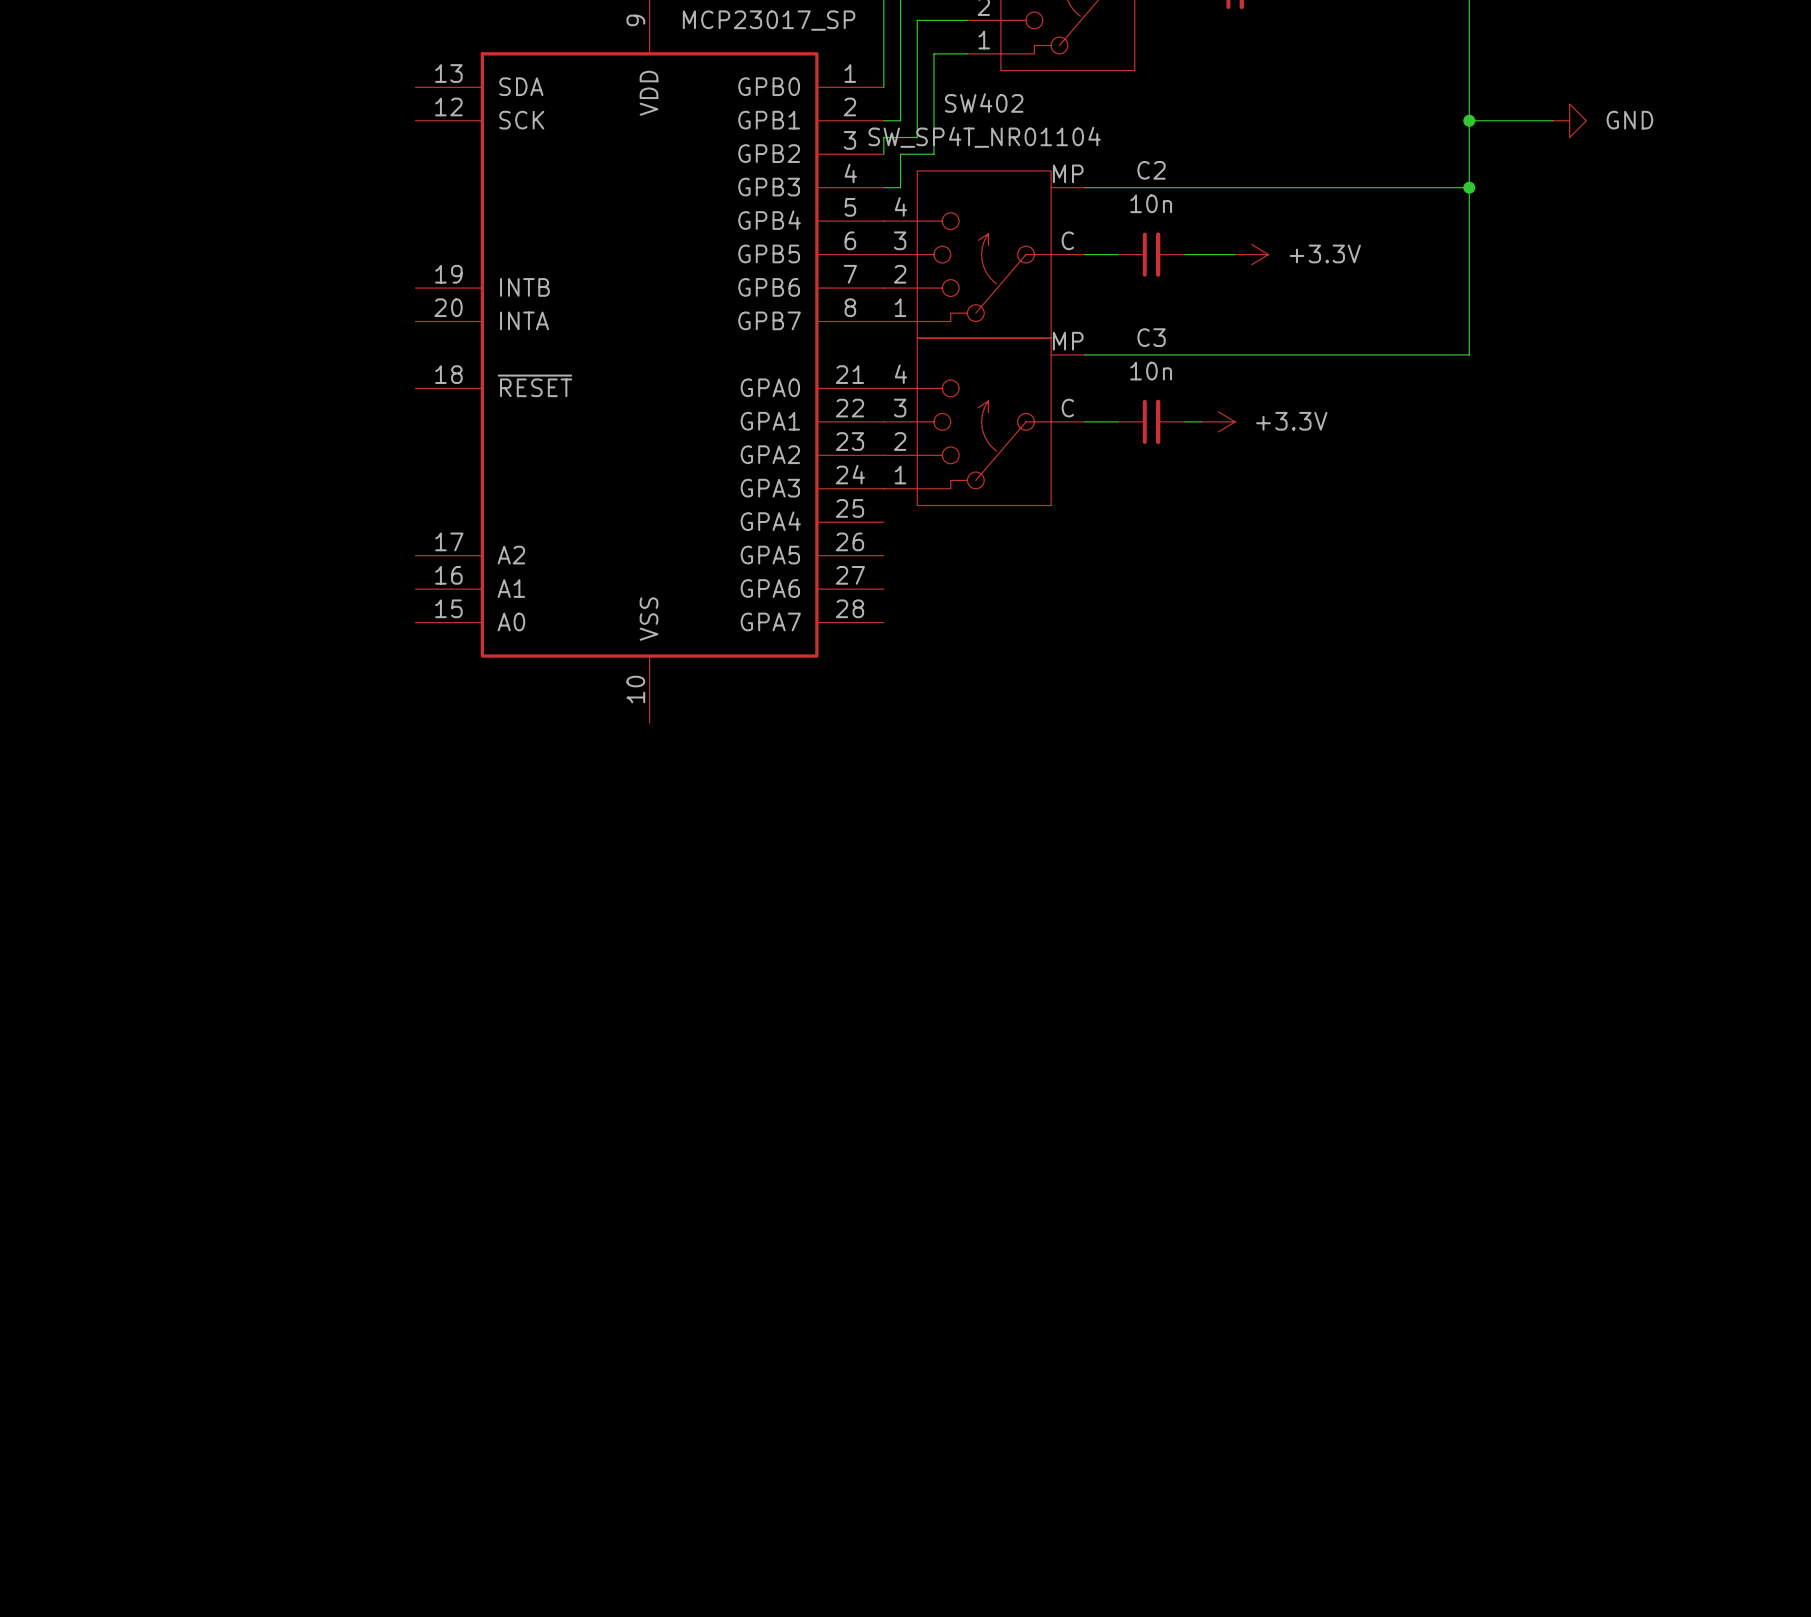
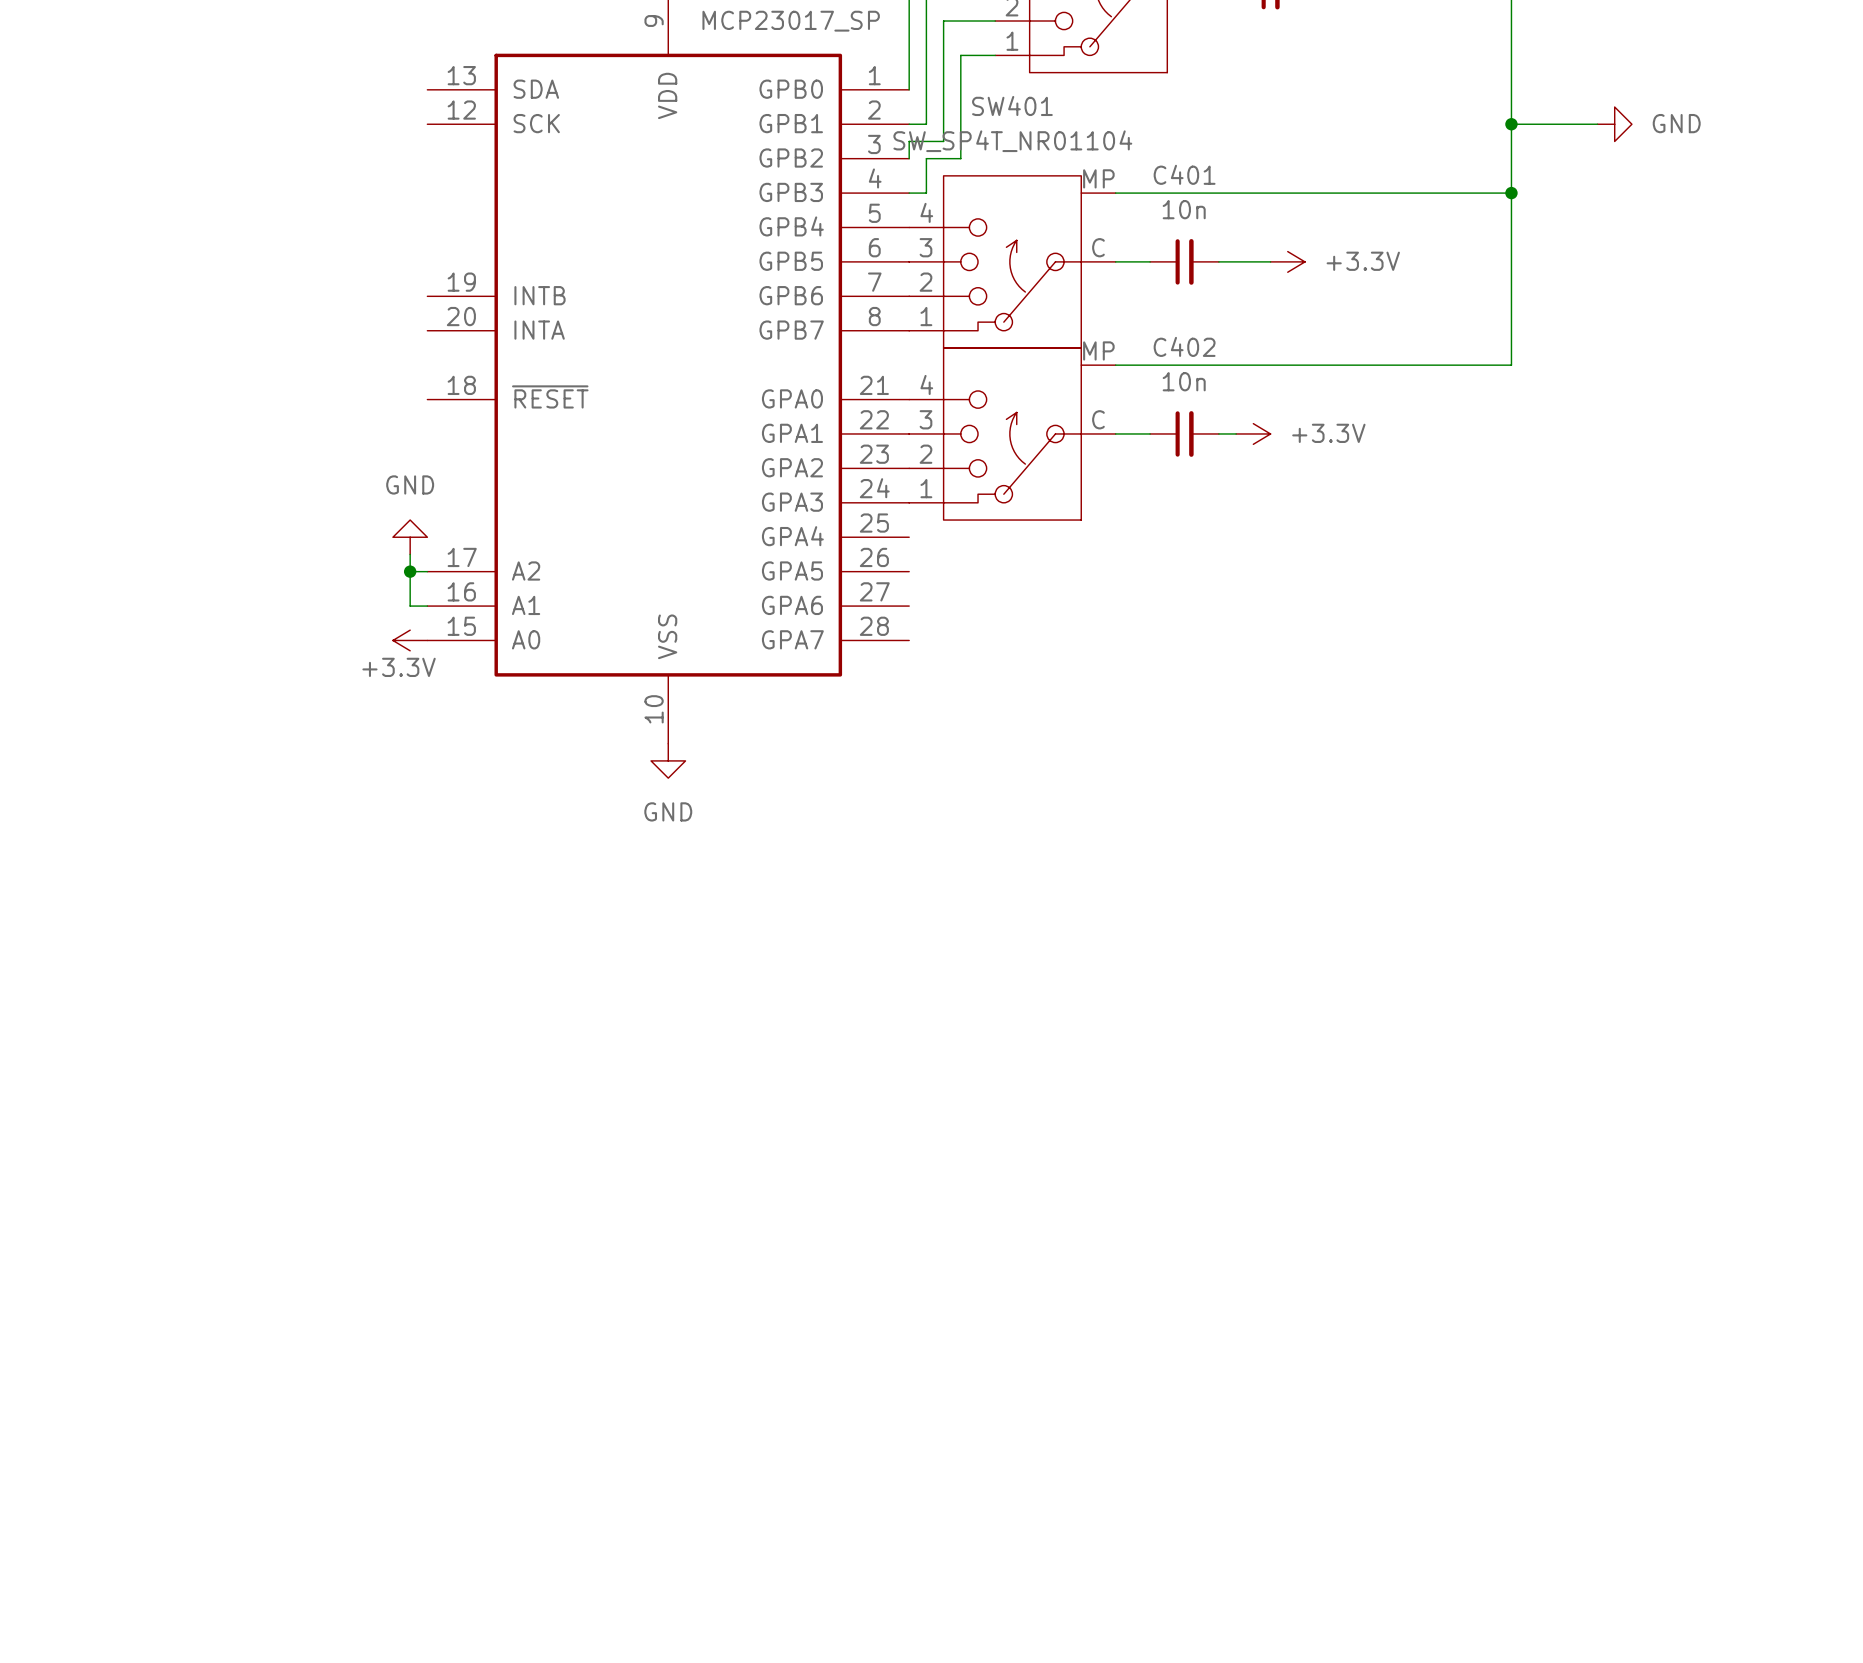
SW402 name: SW402 (984, 103) -> SW401 (1012, 105)
C2 name: C2 (1151, 170) -> C401 (1184, 174)
C3 name: C3 (1151, 337) -> C402 (1184, 346)
power symbol: none -> GND (410, 537)
wire: none -> (410, 554) (410, 606) (427, 606)
wire: none -> (410, 571) (427, 571)
junction: none -> (410, 571)
power symbol: none -> +3.3V (410, 640)
power symbol: none -> GND (668, 760)

